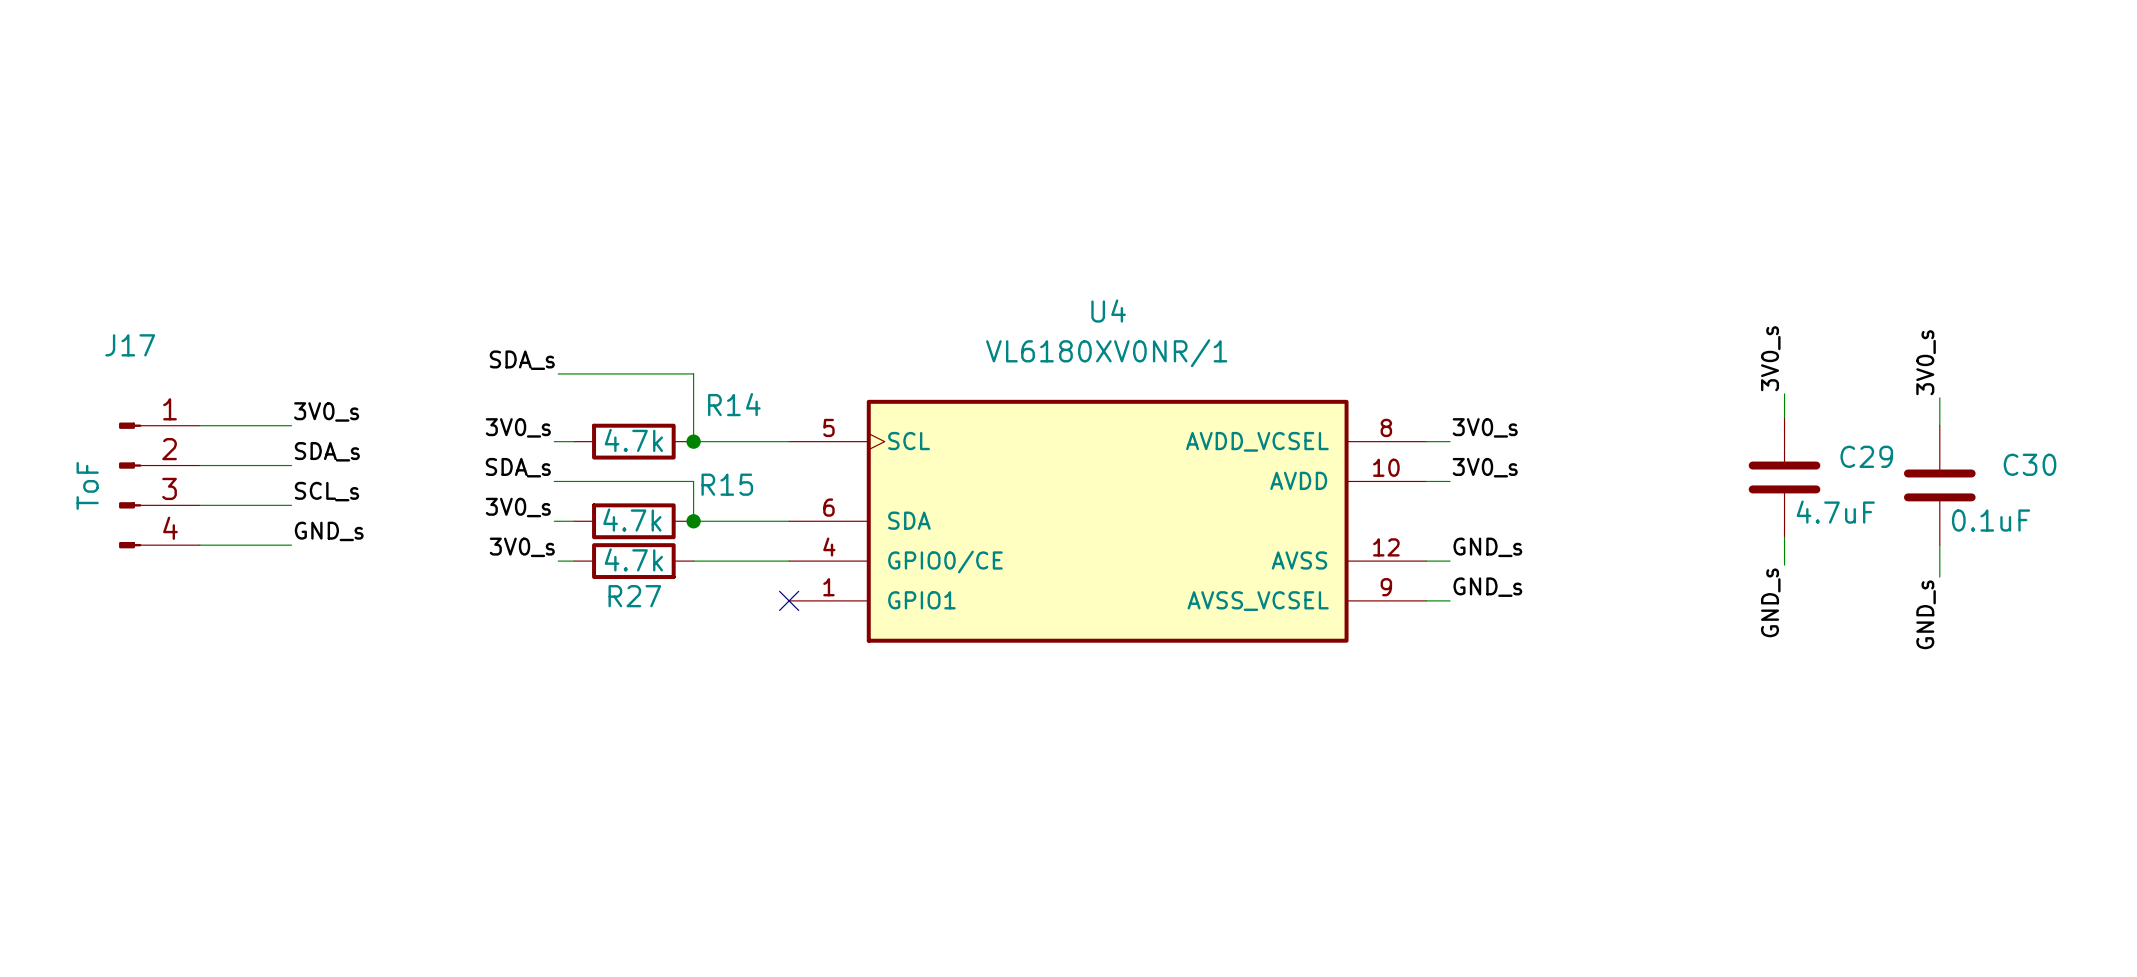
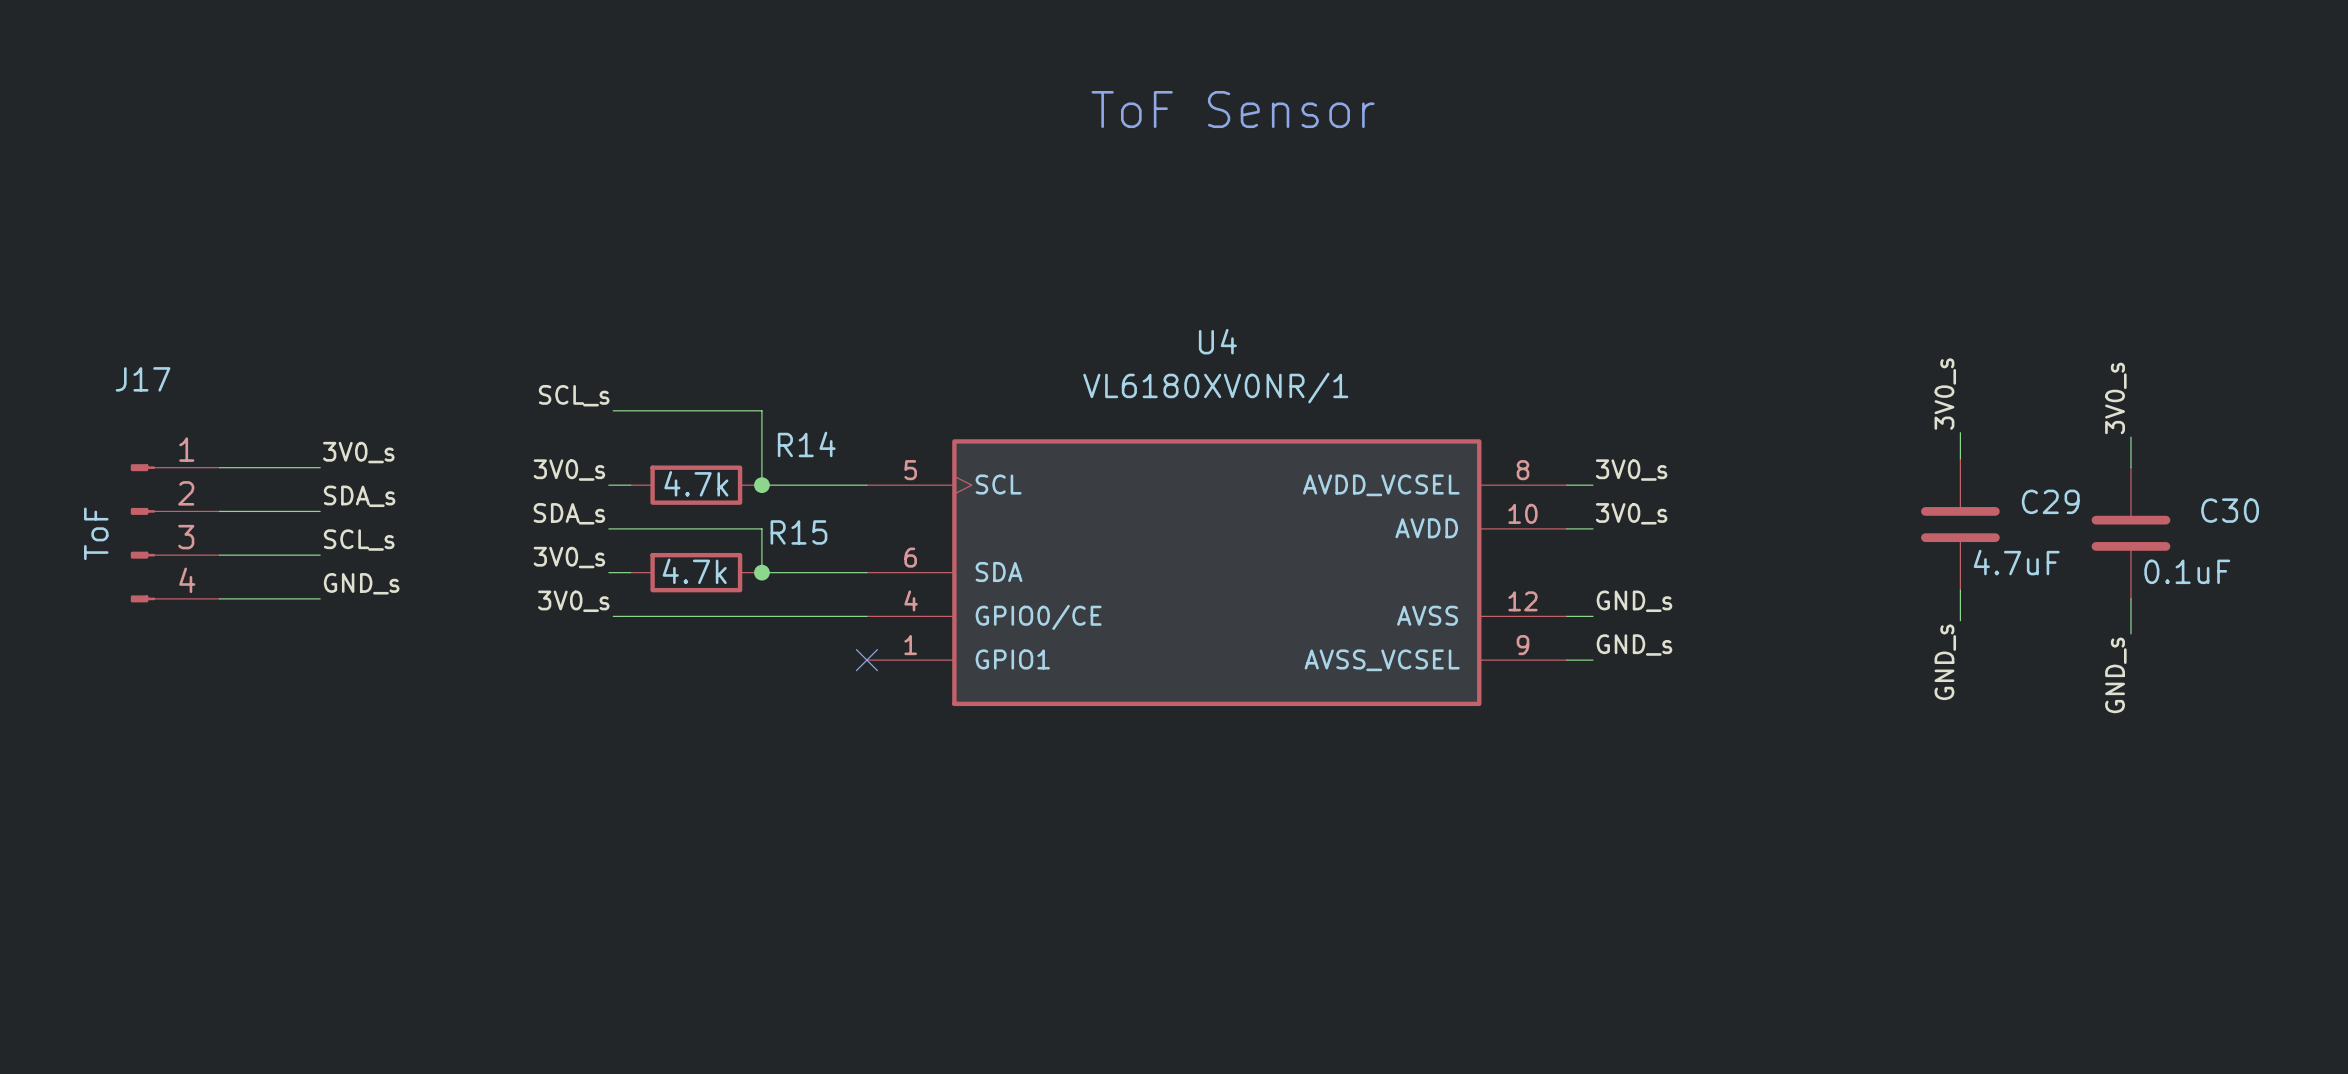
text: none -> ToF Sensor (1233, 109)
label: SDA_s (522, 360) -> SCL_s (574, 395)
wire: none -> (630, 616) (761, 616)
R27: 4.7k (633, 561) -> none

